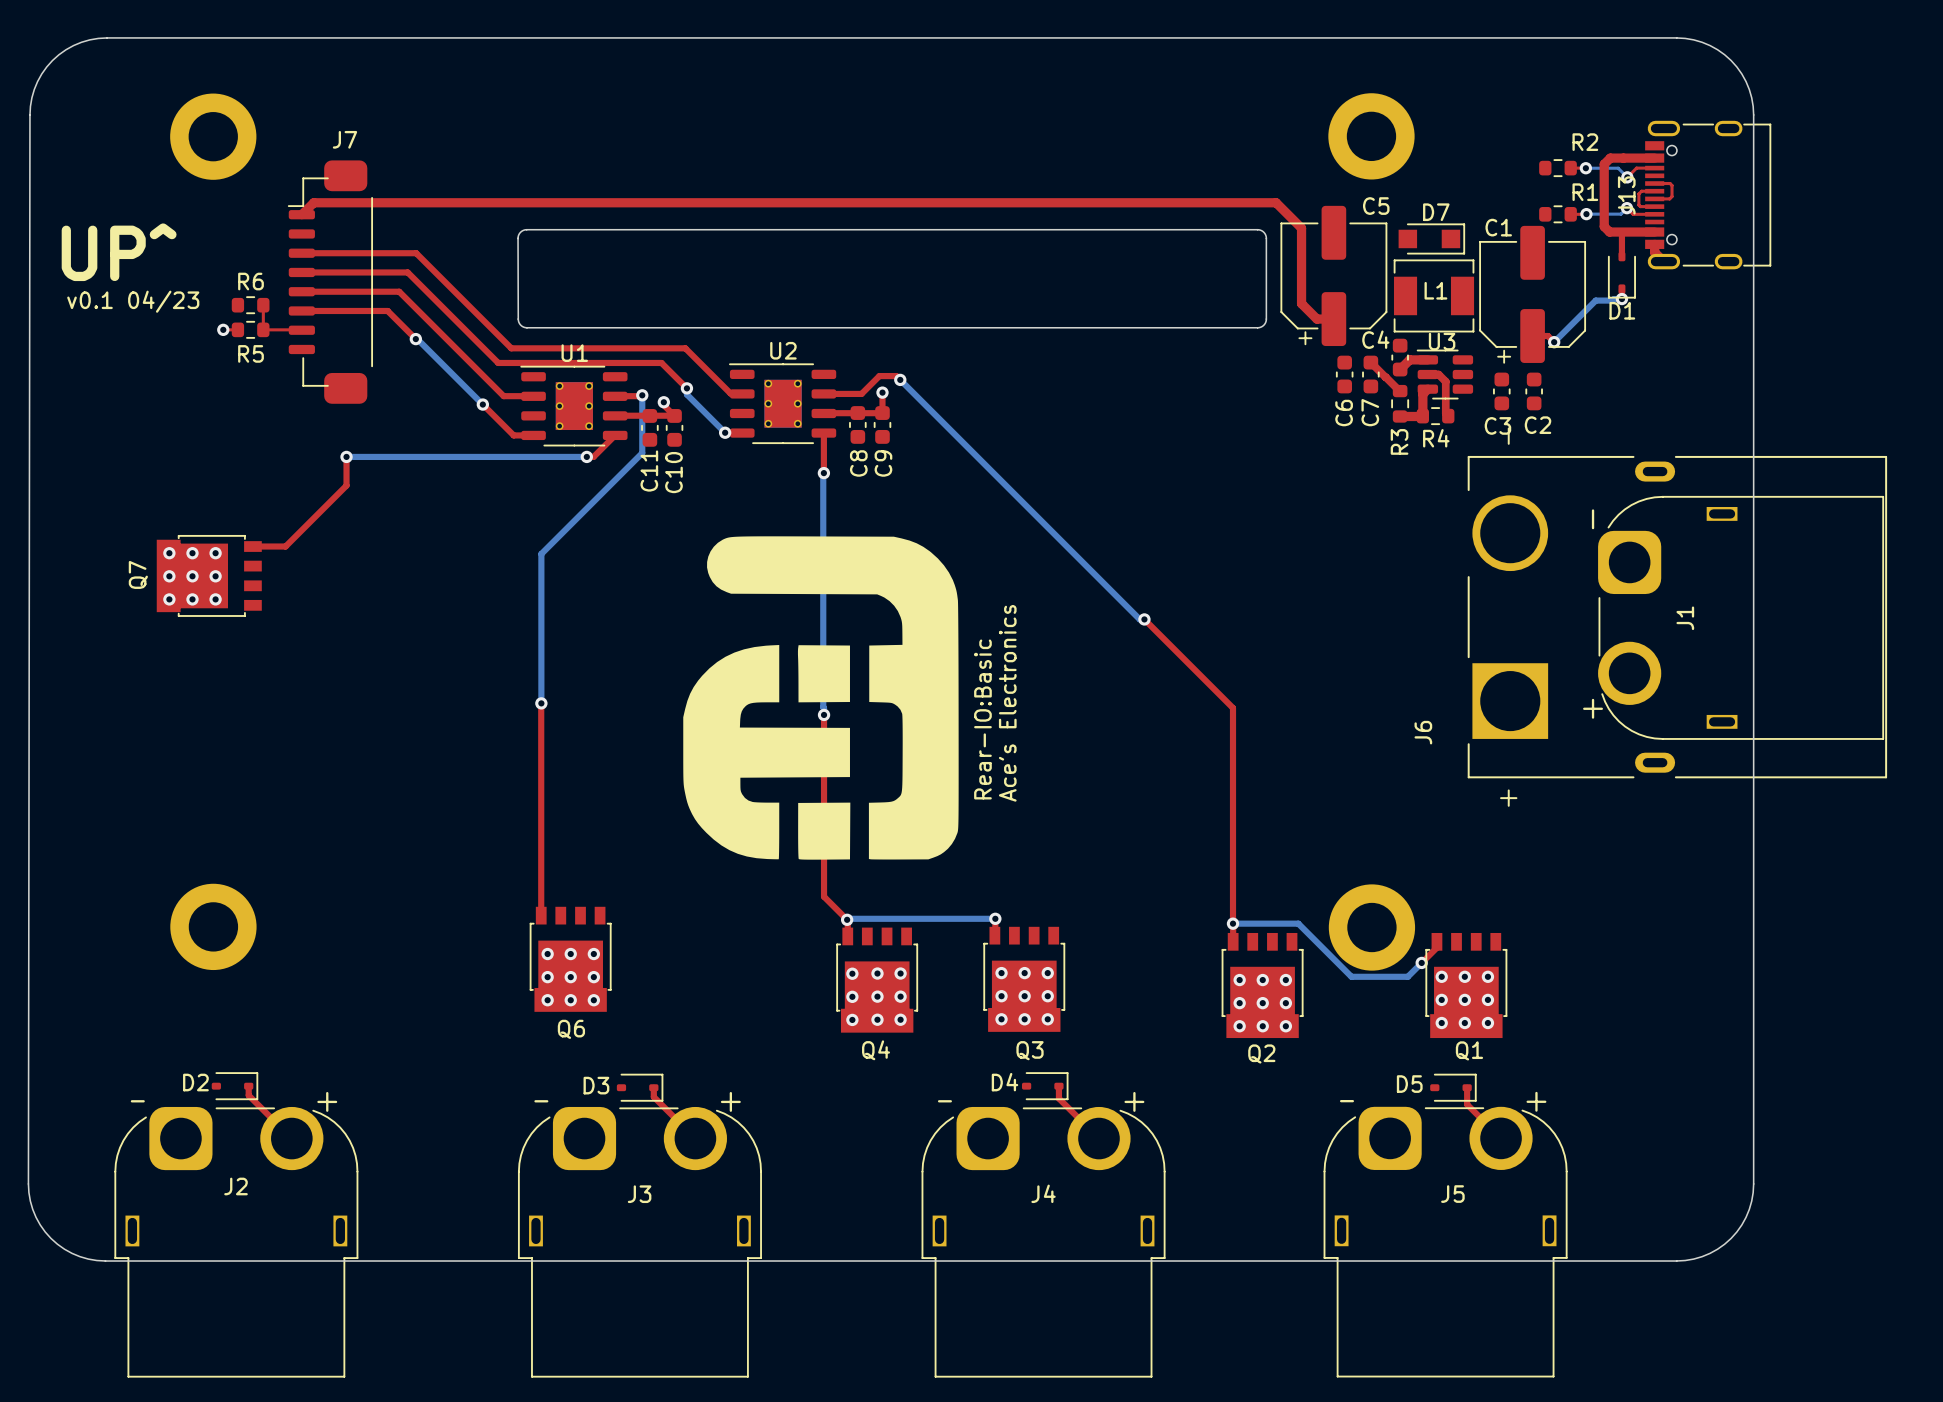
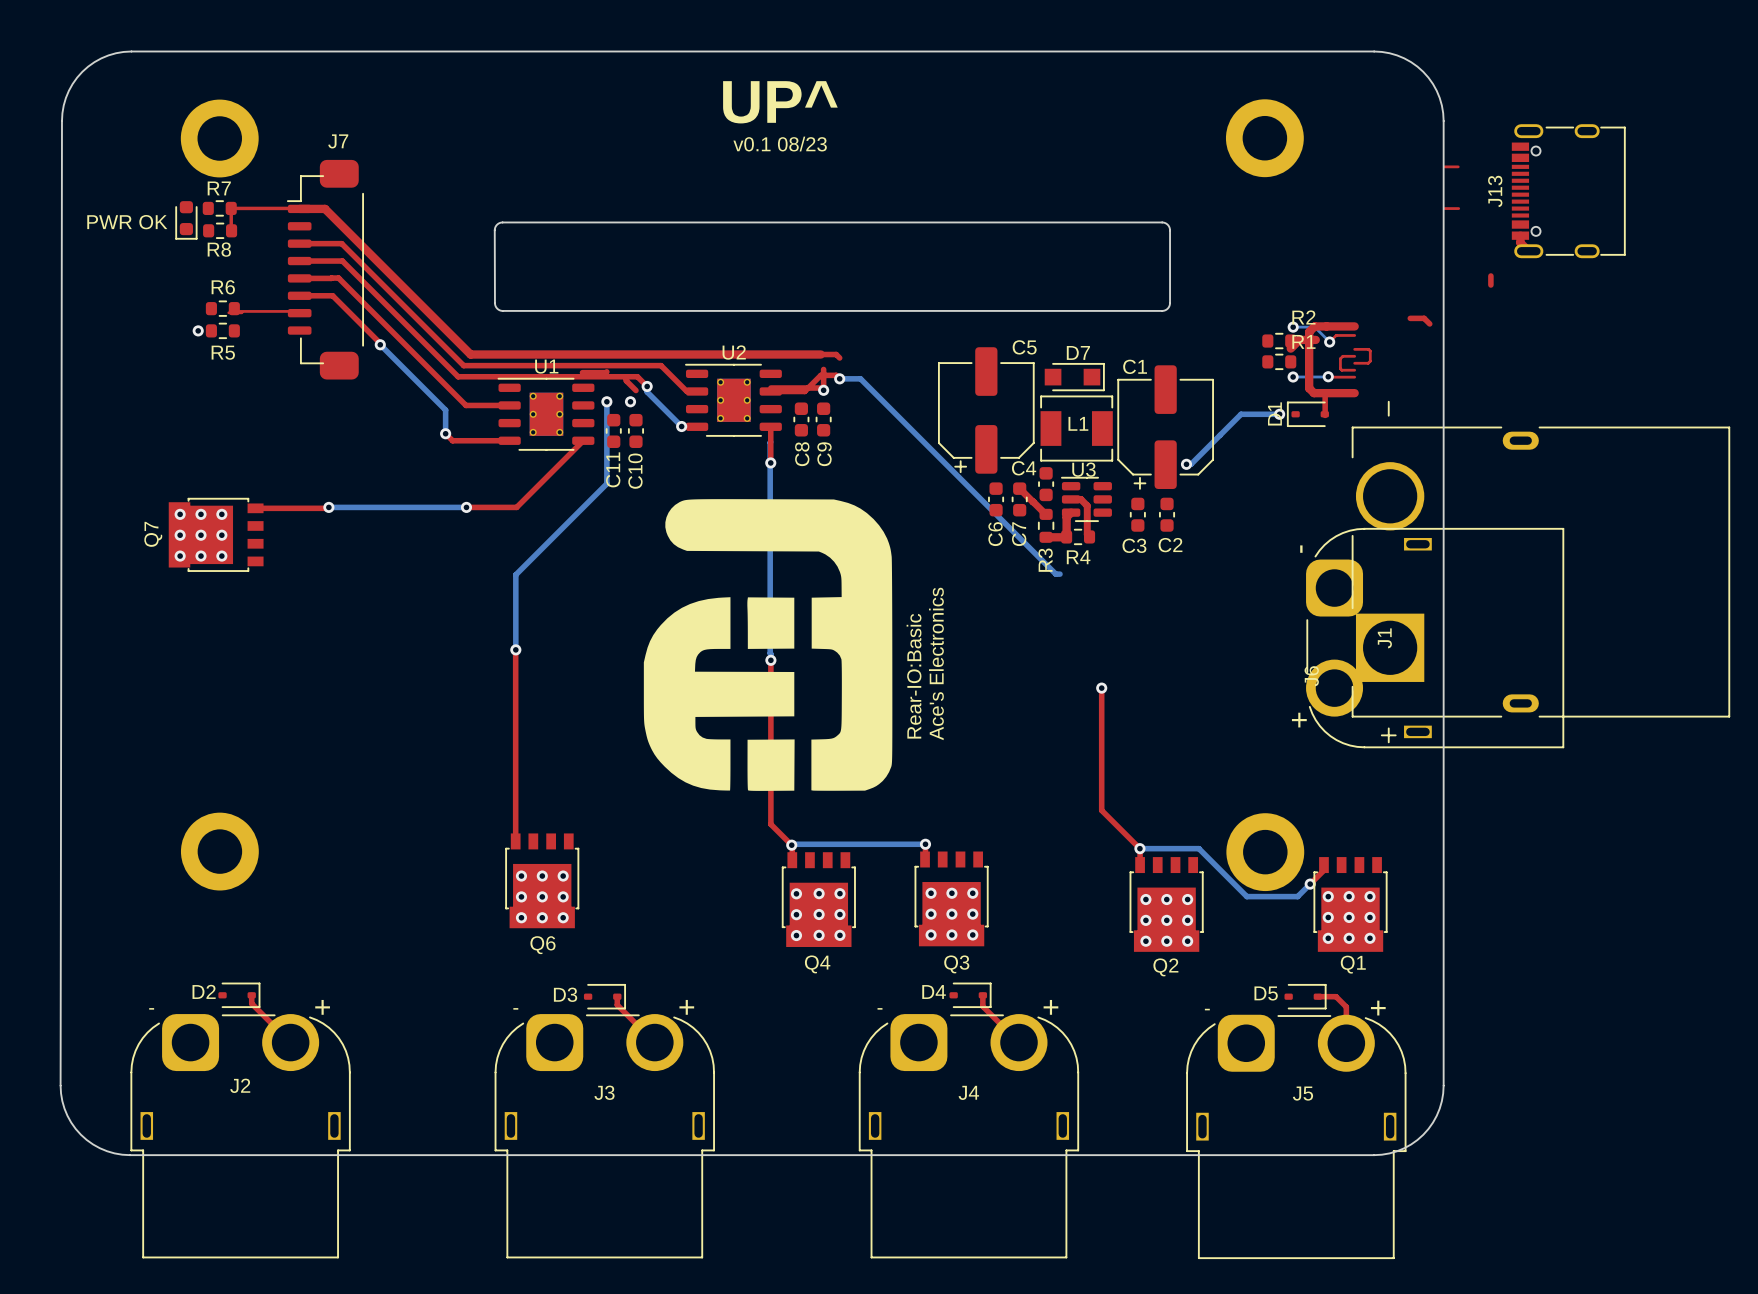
board edge: (106, 37) (1676, 37) (1702, 42) (1724, 54) (1736, 66) (1746, 81) (1751, 97) (1753, 114) (1753, 1183) (1749, 1209) (1736, 1232) (1724, 1244) (1710, 1253) (1693, 1259) (1676, 1261) (105, 1261) (80, 1256) (57, 1244) (45, 1232) (36, 1217) (30, 1201) (28, 1183) (29, 114) (31, 97) (37, 81) (52, 60) (73, 45) (89, 39) (106, 37) -> (131, 51) (108, 55) (94, 62) (82, 71) (72, 84) (65, 98) (61, 120) (60, 1085) (62, 1101) (67, 1115) (75, 1128) (86, 1139) (107, 1151) (130, 1155) (1374, 1155) (1389, 1153) (1404, 1148) (1417, 1139) (1428, 1128) (1439, 1108) (1443, 1085) (1443, 120) (1441, 105) (1436, 90) (1428, 77) (1417, 66) (1397, 55) (1374, 51) (131, 51)
text: none -> UP^ (780, 102)
text: none -> v0.1 08/23 (780, 144)
top track: (1654, 158) (1610, 158) (1604, 164) (1604, 226) (1609, 232) (1654, 232) -> (1354, 326) (1314, 326) (1309, 331) (1309, 388) (1314, 393) (1354, 393)
R2 position: (1558, 168) -> (1279, 341)
bottom track: (1585, 168) (1618, 168) (1627, 177) -> none
via: (1585, 168) -> none
top track: (1654, 168) (1636, 168) (1627, 177) -> none
via: (1627, 177) -> none
top track: (1654, 183) (1670, 183) (1672, 185) (1672, 196) (1669, 198) (1654, 198) -> (1354, 349) (1368, 349) (1370, 351) (1370, 361) (1368, 363) (1354, 363)
top track: (1654, 191) (1641, 191) (1638, 193) (1640, 206) (1654, 206) -> (1354, 356) (1342, 356) (1340, 358) (1341, 370) (1354, 370)
top track: (1626, 208) (1633, 214) (1654, 214) -> none
bottom track: (1626, 208) (1620, 214) (1586, 214) -> none
via: (1626, 208) -> none
R7: none -> (219, 208)
top track: (301, 214) (313, 202) (1276, 202) (1301, 228) (1301, 303) (1316, 319) (1333, 319) -> none
R1 position: (1558, 214) -> (1279, 361)
via: (1586, 214) -> none
part: none -> (186, 220)
text: none -> PWR OK (127, 222)
top track: (1620, 232) (1621, 256) -> (1323, 393) (1325, 415)
R8: none -> (220, 230)
D7 position: (1431, 238) -> (1074, 377)
text: UP^ (119, 252) -> none
top track: (348, 253) (416, 253) (511, 348) (685, 348) (730, 393) (742, 393) -> (341, 243) (463, 365) (661, 365) (686, 391) (697, 391)
top track: (349, 272) (407, 272) (498, 362) (661, 362) (686, 388) -> none
C5 position: (1333, 275) -> (986, 410)
D1 rotation: 0° (1621, 275) -> 90° clockwise (1307, 414)
D1 position: (1621, 275) -> (1307, 414)
top track: (336, 291) (399, 291) (503, 396) (533, 396) -> (331, 278) (338, 278) (465, 405) (509, 405)
C1 position: (1532, 294) -> (1165, 427)
L1 position: (1434, 295) -> (1076, 428)
bottom track: (1621, 299) (1595, 300) (1554, 342) -> none
via: (1621, 299) -> none
text: v0.1 04/23 (133, 301) -> none
R6 position: (250, 305) -> (222, 308)
top track: (263, 305) (263, 329) (301, 329) -> (237, 311) (299, 312)
top track: (338, 310) (387, 310) -> (342, 261) (377, 295)
top track: none -> (332, 295) (380, 344)
via position: (223, 329) -> (198, 330)
R5 position: (250, 329) -> (222, 330)
top track: none -> (402, 321) (458, 376) (637, 376) (647, 386)
bottom track: (415, 339) (482, 404) -> none
via position: (415, 339) -> (380, 344)
via: (1554, 342) -> none
bottom track: none -> (1293, 327) (1314, 327) (1329, 342)
via: none -> (1293, 327)
top track: none -> (1354, 335) (1336, 335) (1329, 342)
C4 position: (1400, 357) -> (1046, 484)
top track: (1370, 362) (1400, 391) -> (1019, 488) (1046, 514)
via: none -> (1329, 342)
bottom track: none -> (380, 344) (445, 410) (445, 433)
C6 position: (1344, 374) -> (996, 499)
C7 position: (1370, 374) -> (1019, 499)
top track: (1427, 374) (1438, 374) (1445, 381) (1445, 413) (1448, 416) -> (1071, 499) (1080, 499) (1087, 505) (1087, 534) (1089, 536)
U3 position: (1444, 374) -> (1086, 499)
top track: (879, 376) (861, 393) (823, 393) -> (820, 354) (470, 354) (325, 208) (231, 208) (231, 230)
bottom track: (900, 379) (923, 403) -> (839, 378) (860, 378)
via: (900, 379) -> none
bottom track: (686, 388) (686, 394) (725, 432) -> (647, 386) (647, 392) (681, 426)
via: (686, 388) -> none
top track: (1427, 389) (1422, 394) (1422, 416) (1400, 416) -> (1071, 512) (1066, 517) (1066, 537) (1046, 537)
C3 position: (1501, 391) -> (1137, 514)
C2 position: (1534, 391) -> (1167, 514)
via: (882, 392) -> none
bottom track: (642, 395) (642, 428) -> none
via: (642, 395) -> none
via: none -> (1293, 377)
top track: none -> (1328, 376) (1354, 377)
bottom track: none -> (1328, 376) (1293, 377)
via: none -> (1328, 376)
via: (663, 402) -> none
U2 position: (782, 403) -> (733, 400)
top track: none -> (839, 378) (836, 375) (820, 375) (804, 391) (770, 391)
via: none -> (839, 378)
R3 position: (1400, 403) -> (1046, 525)
top track: (482, 404) (513, 435) (533, 435) -> none
via: (482, 404) -> none
U1 position: (573, 406) -> (546, 414)
via: none -> (647, 386)
top track: (615, 415) (674, 415) -> none
via: none -> (823, 390)
R4 position: (1435, 416) -> (1078, 536)
C8 position: (857, 424) -> (801, 419)
C9 position: (882, 424) -> (823, 419)
C11 position: (649, 427) -> (613, 430)
C10 position: (674, 427) -> (635, 430)
via: none -> (606, 401)
via: none -> (630, 401)
via: (725, 432) -> none
top track: (823, 433) (823, 456) -> (770, 442) (770, 462)
top track: (615, 435) (593, 456) (586, 456) -> none
bottom track: none -> (1279, 414) (1241, 414) (1191, 464) (1186, 464)
via: none -> (1279, 414)
bottom track: (642, 453) (541, 553) (541, 620) -> (606, 424) (606, 483) (515, 574)
via: none -> (681, 426)
top track: (346, 456) (346, 485) (285, 546) -> (328, 507) (285, 508)
bottom track: (346, 456) (586, 456) -> none
via: (346, 456) -> none
via: (586, 456) -> none
top track: none -> (445, 433) (452, 440) (509, 440)
via: none -> (445, 433)
top track: none -> (583, 440) (516, 507) (466, 507)
via position: (823, 473) -> (770, 462)
via: none -> (1186, 464)
bottom track: none -> (328, 507) (466, 507)
via: none -> (328, 507)
via: none -> (466, 507)
J1 position: (1741, 617) -> (1435, 638)
top track: (1144, 619) (1233, 708) (1233, 923) -> (1101, 688) (1101, 810) (1139, 848)
via: (1144, 619) -> none
via: none -> (1101, 688)
top track: none -> (1317, 996) (1336, 996) (1346, 1006) (1346, 1043)
D5 position: (1453, 1087) -> (1305, 996)
top track: (1467, 1087) (1467, 1104) (1501, 1138) -> none
J5 position: (1445, 1242) -> (1296, 1136)

